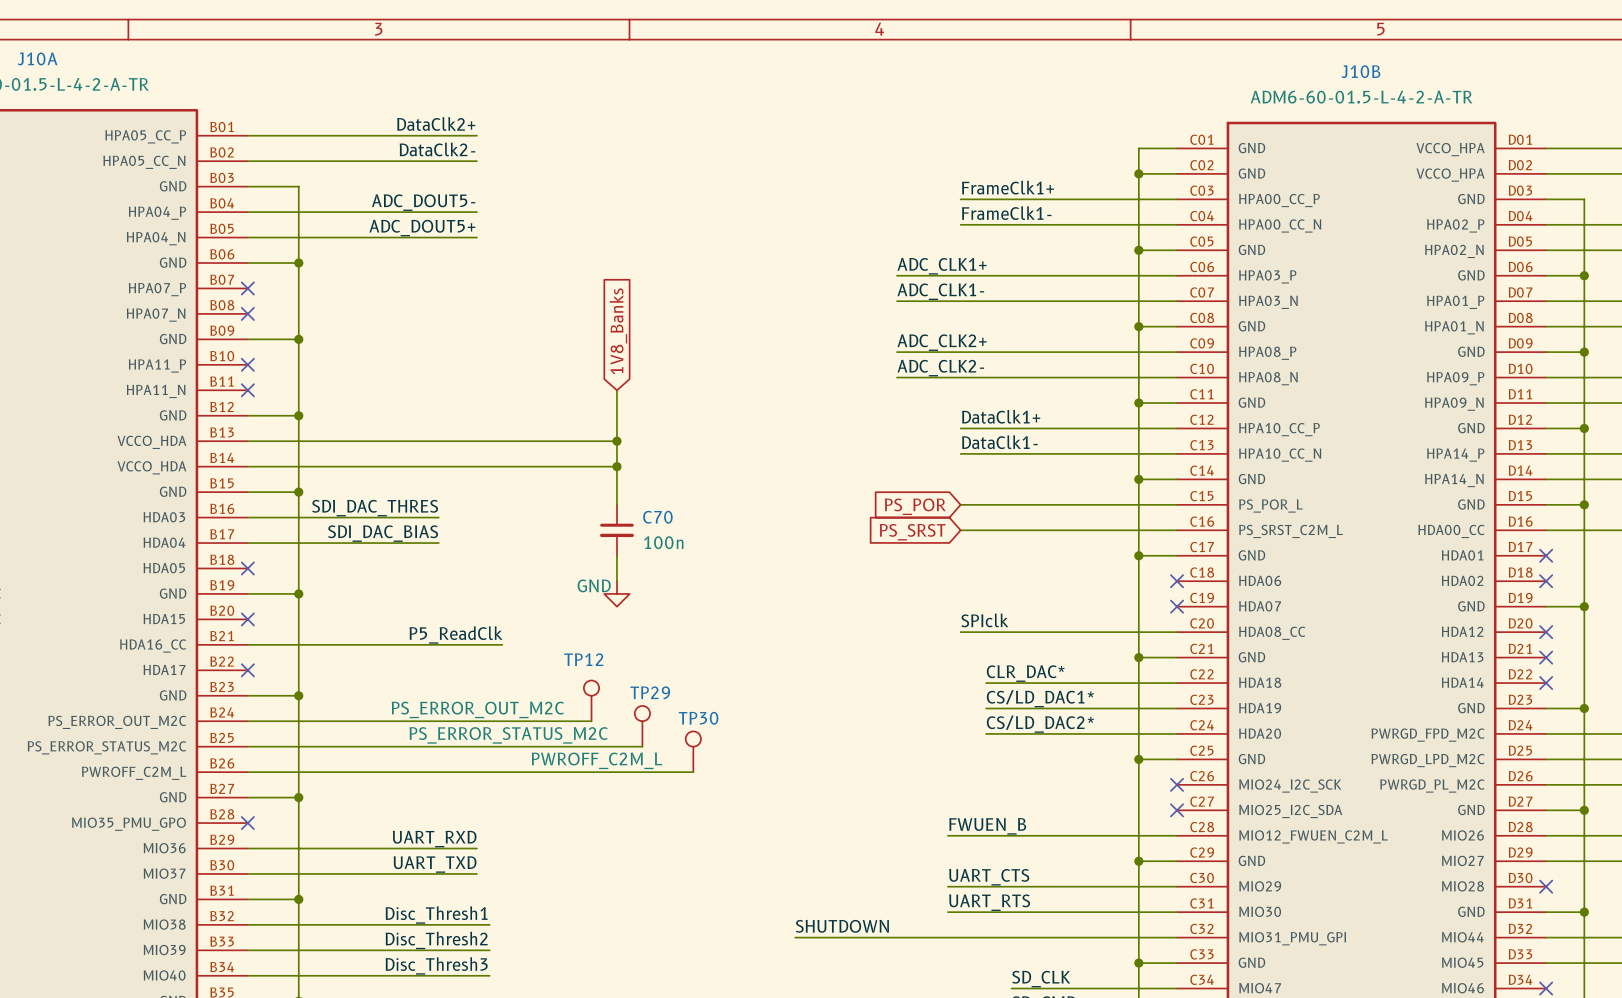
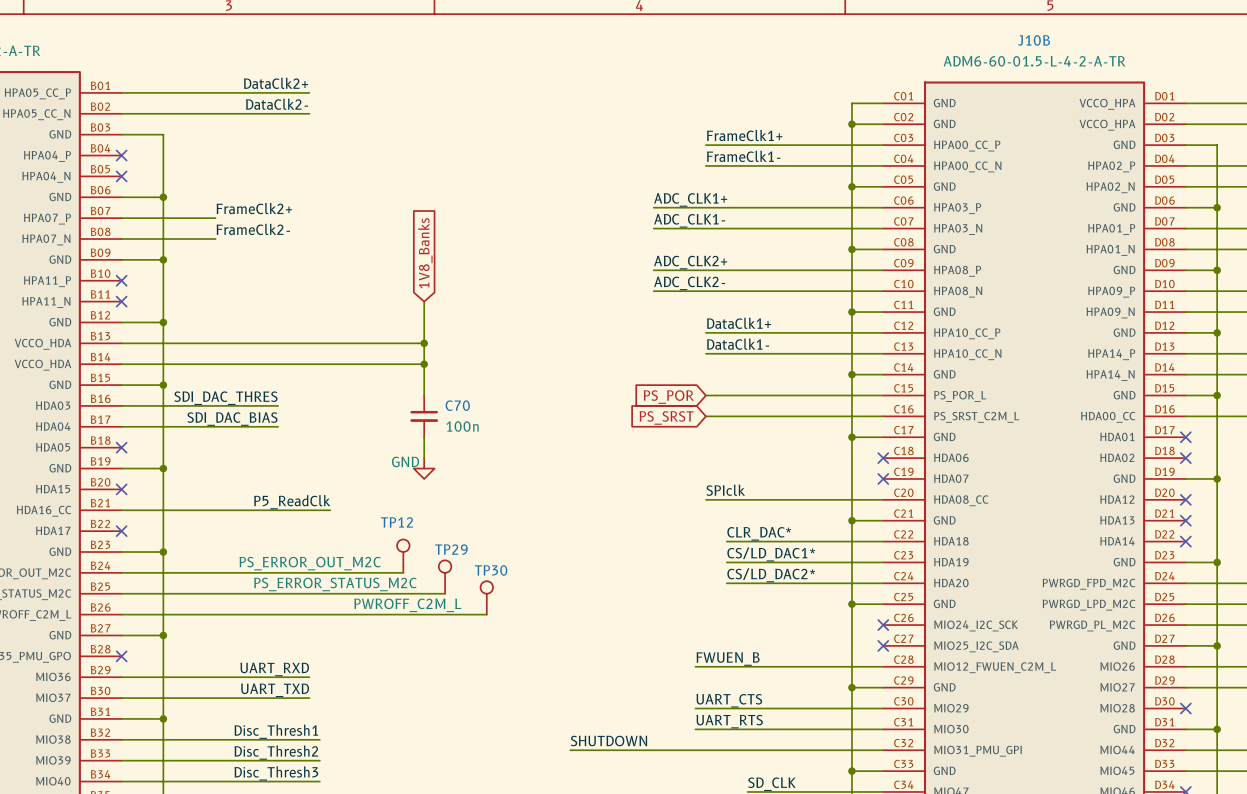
label: ADC_DOUT5- (423, 202) -> none
wire: (247, 212) (476, 212) -> none
no-connect mark: none -> (121, 155)
label: ADC_DOUT5+ (422, 228) -> none
wire: (247, 237) (476, 237) -> none
no-connect mark: none -> (121, 176)
label: none -> FrameClk2+ (254, 208)
wire: none -> (121, 218) (215, 218)
no-connect mark: (247, 288) -> none
label: none -> FrameClk2- (253, 229)
wire: none -> (121, 239) (215, 239)
no-connect mark: (247, 313) -> none

